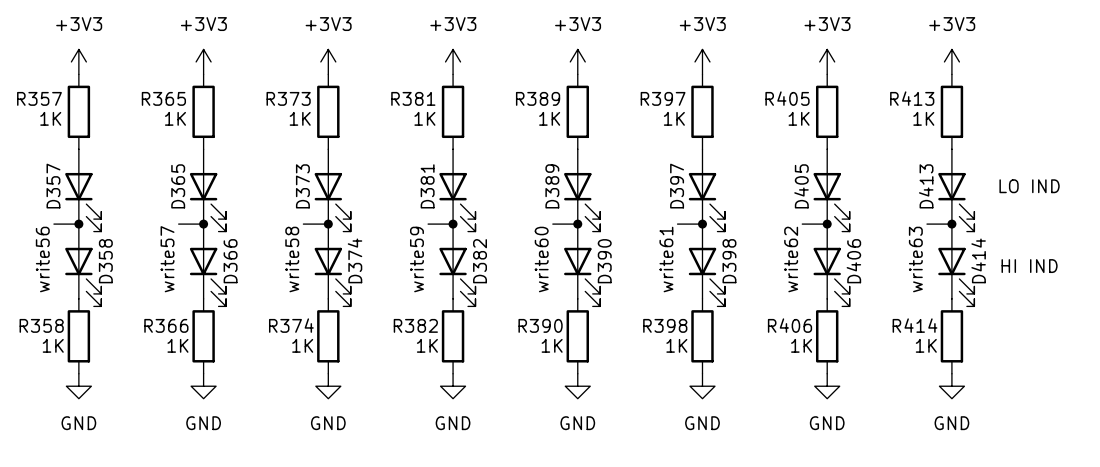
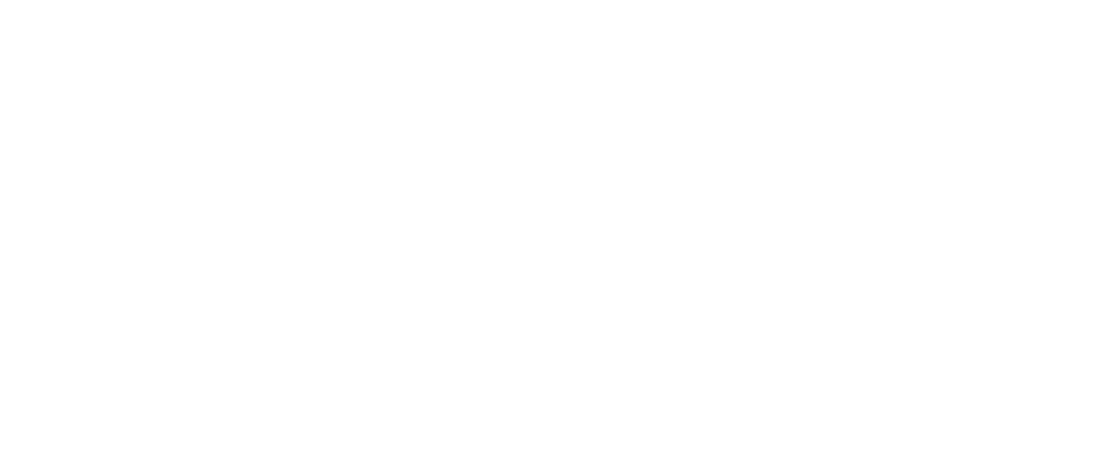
power symbol: +3V3 (78, 61) -> none
power symbol: +3V3 (203, 61) -> none
power symbol: +3V3 (328, 61) -> none
power symbol: +3V3 (453, 61) -> none
power symbol: +3V3 (577, 61) -> none
power symbol: +3V3 (702, 61) -> none
power symbol: +3V3 (827, 61) -> none
power symbol: +3V3 (951, 61) -> none
R357: 1K (78, 111) -> none
R365: 1K (203, 111) -> none
R373: 1K (328, 111) -> none
R381: 1K (453, 111) -> none
R389: 1K (577, 111) -> none
R397: 1K (702, 111) -> none
R405: 1K (827, 111) -> none
R413: 1K (951, 111) -> none
text: LO IND (1029, 186) -> none
D357: (83, 190) -> none
D365: (207, 190) -> none
D373: (332, 190) -> none
D381: (457, 190) -> none
D389: (582, 190) -> none
D397: (706, 190) -> none
D405: (831, 190) -> none
D413: (956, 190) -> none
wire: (53, 224) (78, 224) -> none
junction: (78, 224) -> none
wire: (178, 224) (203, 224) -> none
junction: (203, 224) -> none
wire: (303, 224) (328, 224) -> none
junction: (328, 224) -> none
wire: (428, 224) (453, 224) -> none
junction: (453, 224) -> none
wire: (552, 224) (577, 224) -> none
junction: (577, 224) -> none
wire: (677, 224) (702, 224) -> none
junction: (702, 224) -> none
wire: (802, 224) (827, 224) -> none
junction: (827, 224) -> none
wire: (926, 224) (951, 224) -> none
junction: (951, 224) -> none
label: write56 (42, 259) -> none
label: write57 (167, 259) -> none
label: write58 (292, 259) -> none
label: write59 (416, 259) -> none
label: write60 (541, 259) -> none
label: write61 (666, 259) -> none
label: write62 (791, 259) -> none
label: write63 (915, 259) -> none
D358: (83, 265) -> none
D366: (207, 265) -> none
D374: (332, 265) -> none
D382: (457, 265) -> none
D390: (582, 265) -> none
D398: (706, 265) -> none
D406: (831, 265) -> none
D414: (956, 265) -> none
text: HI IND (1029, 266) -> none
R358: 1K (78, 336) -> none
R366: 1K (203, 336) -> none
R374: 1K (328, 336) -> none
R382: 1K (453, 336) -> none
R390: 1K (577, 336) -> none
R398: 1K (702, 336) -> none
R406: 1K (827, 336) -> none
R414: 1K (951, 336) -> none
power symbol: GND (78, 386) -> none
power symbol: GND (203, 386) -> none
power symbol: GND (328, 386) -> none
power symbol: GND (453, 386) -> none
power symbol: GND (577, 386) -> none
power symbol: GND (702, 386) -> none
power symbol: GND (827, 386) -> none
power symbol: GND (951, 386) -> none

